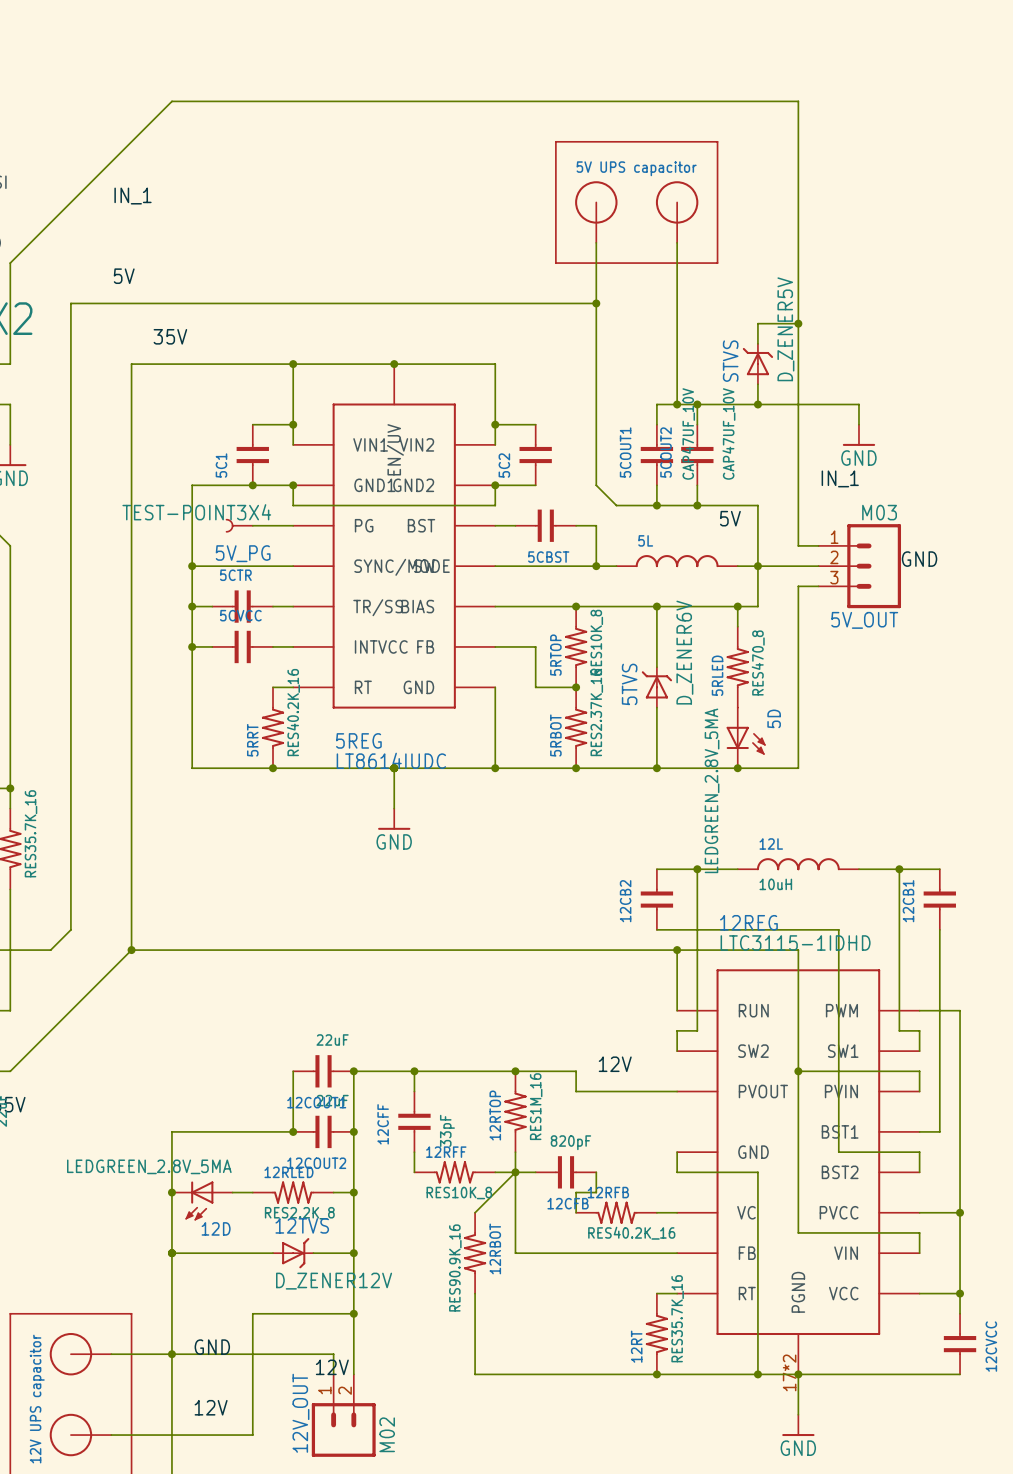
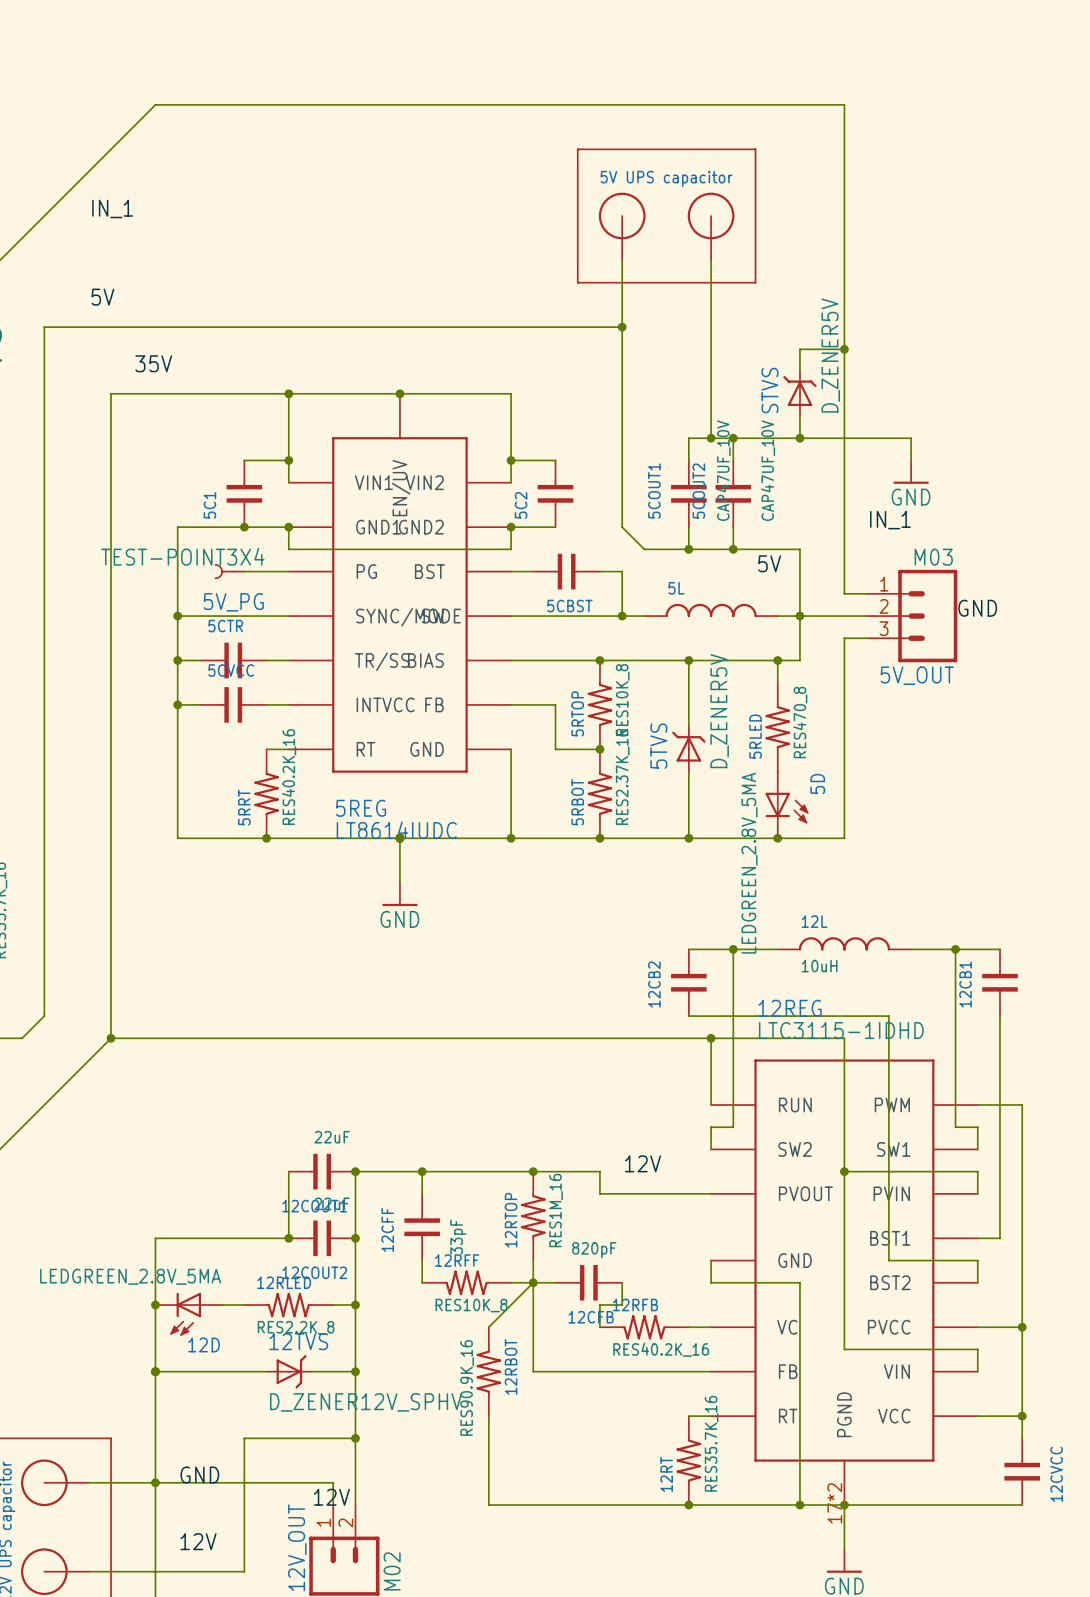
5TVS value: D_ZENER6V (684, 652) -> D_ZENER5V (719, 711)
12TVS value: D_ZENER12V (334, 1281) -> D_ZENER12V_SPHV (366, 1402)

